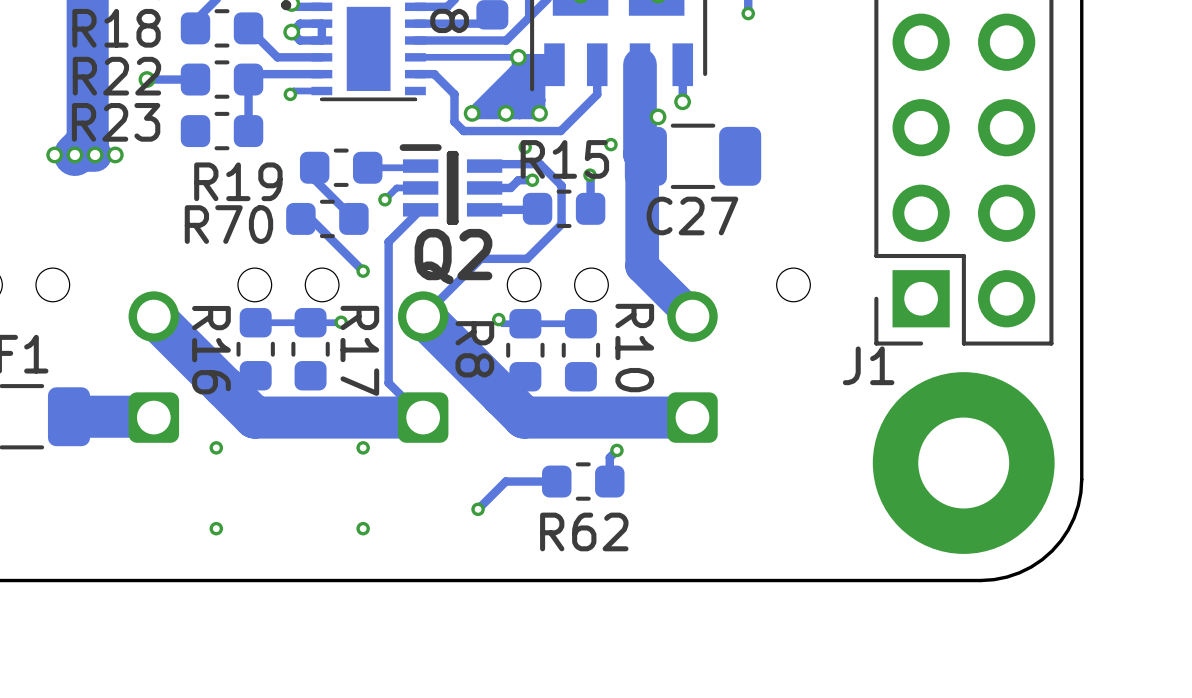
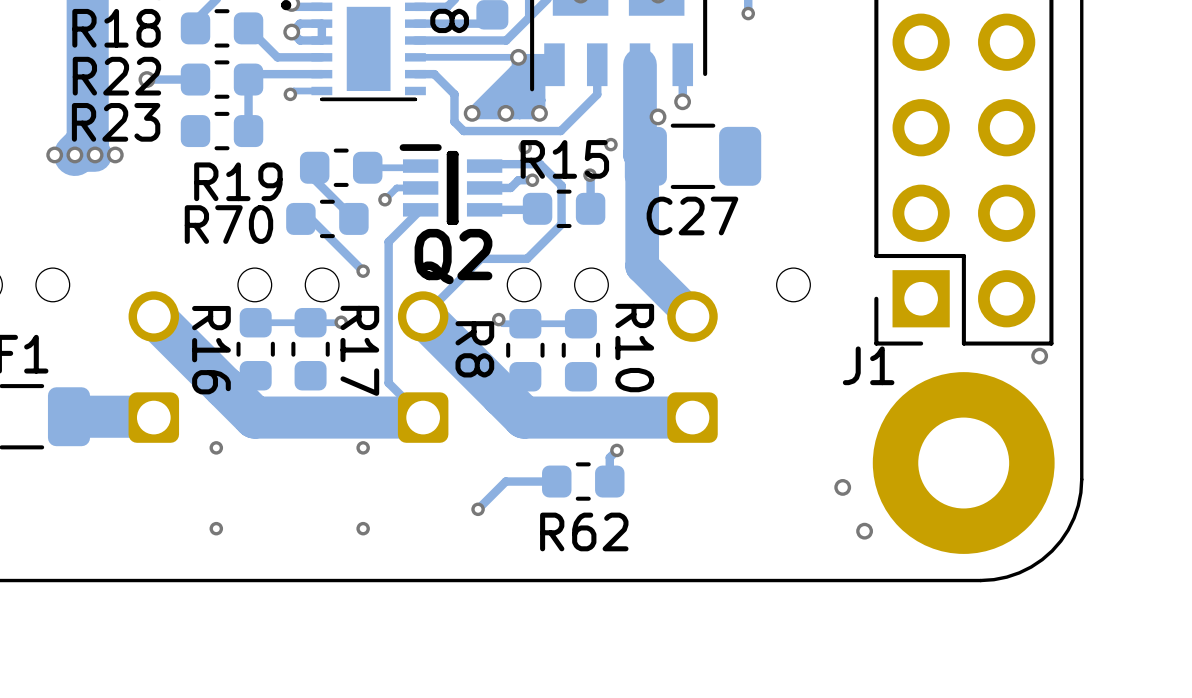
via: none -> (1039, 356)
via: none -> (842, 487)
via: none -> (864, 531)

